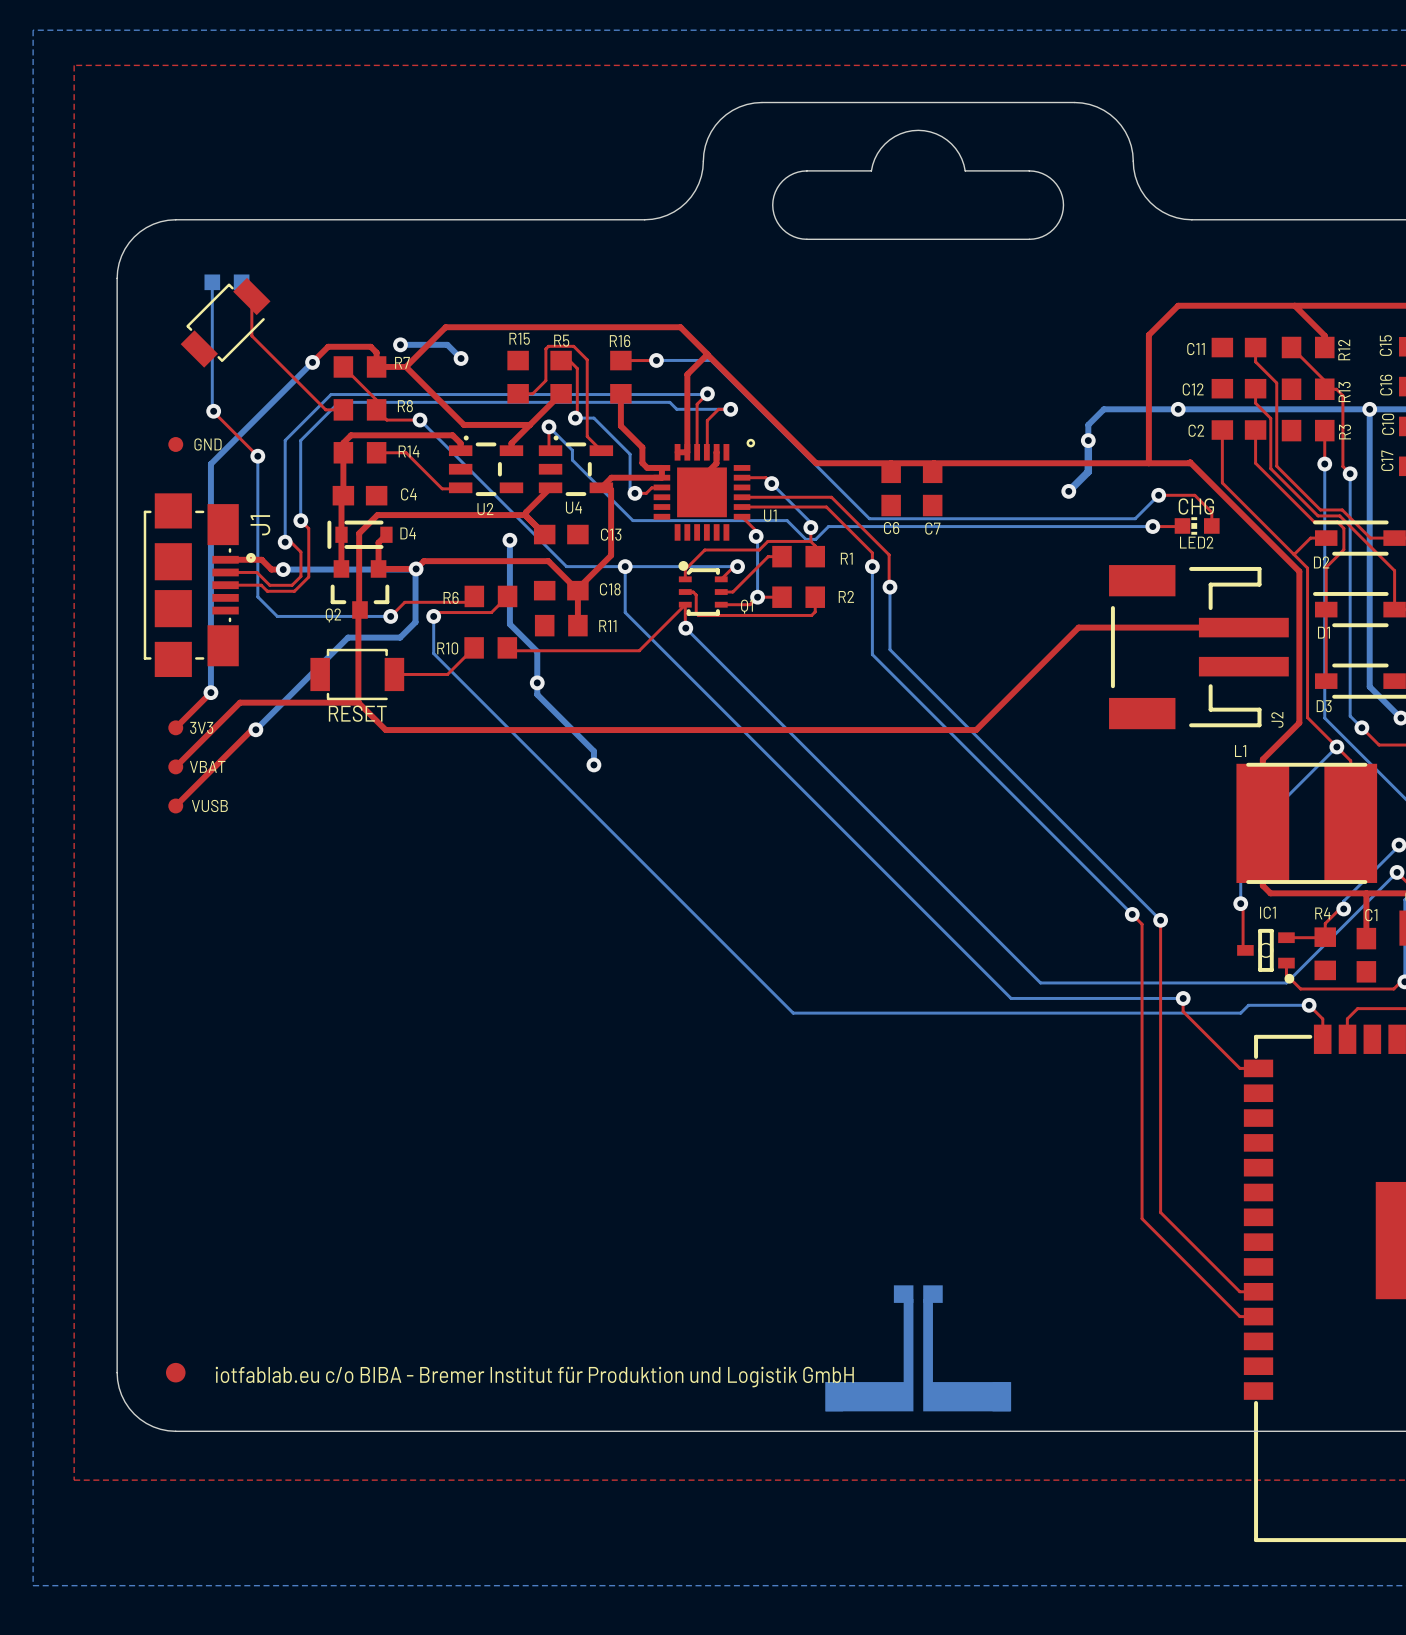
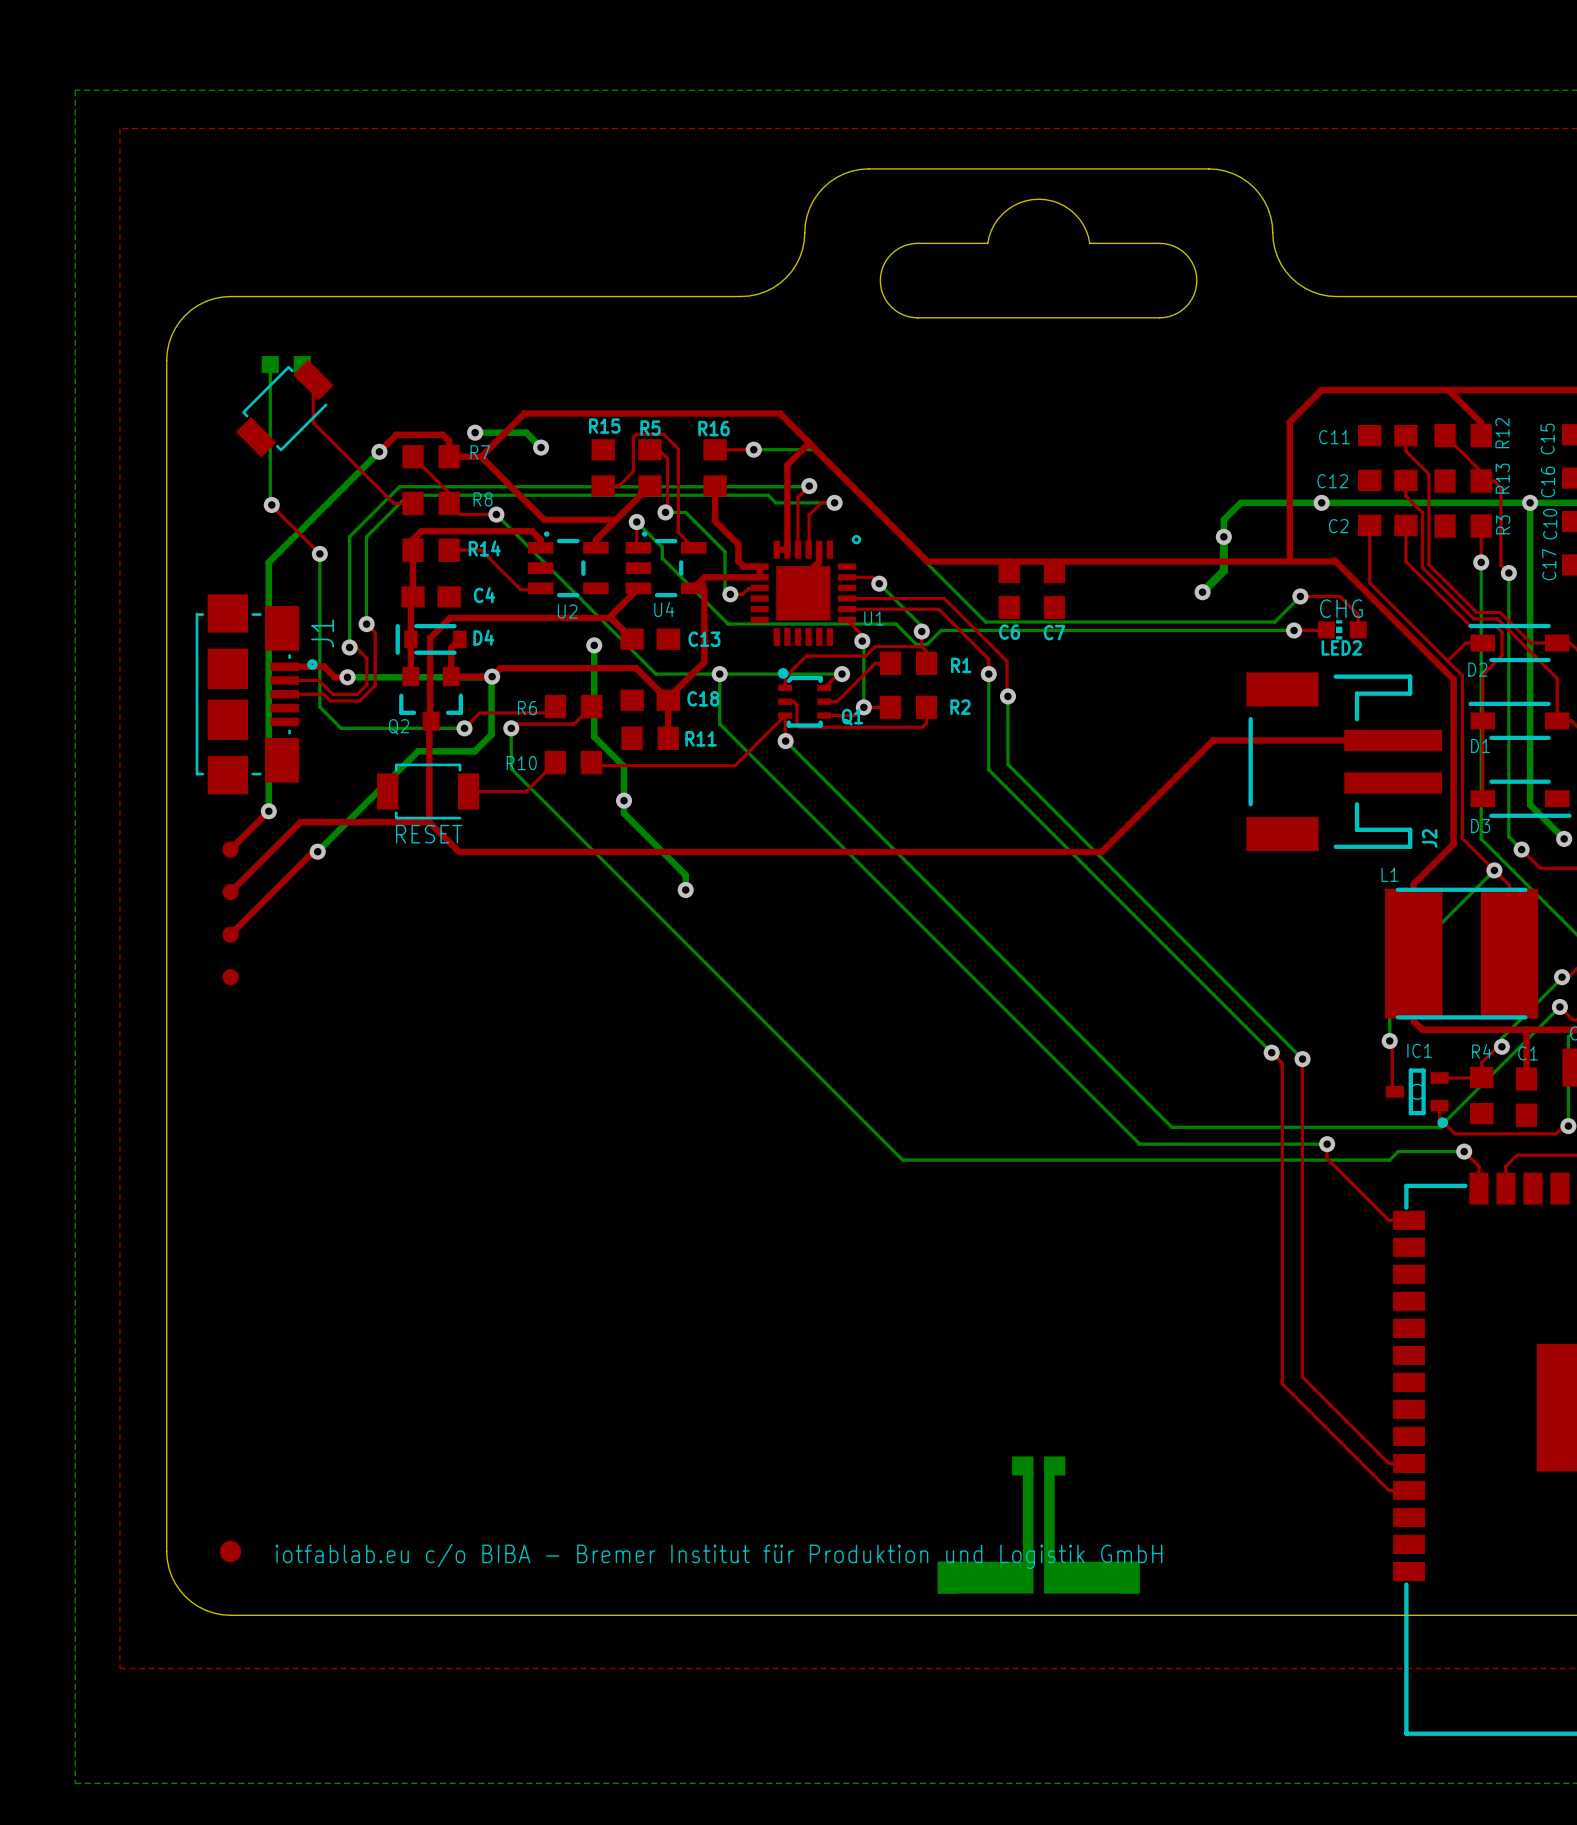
part position: (175, 444) -> (230, 977)
text: GND (208, 444) -> none
text: 3V3 (201, 727) -> none
text: VBAT (207, 766) -> none
text: VUSB (209, 805) -> none

